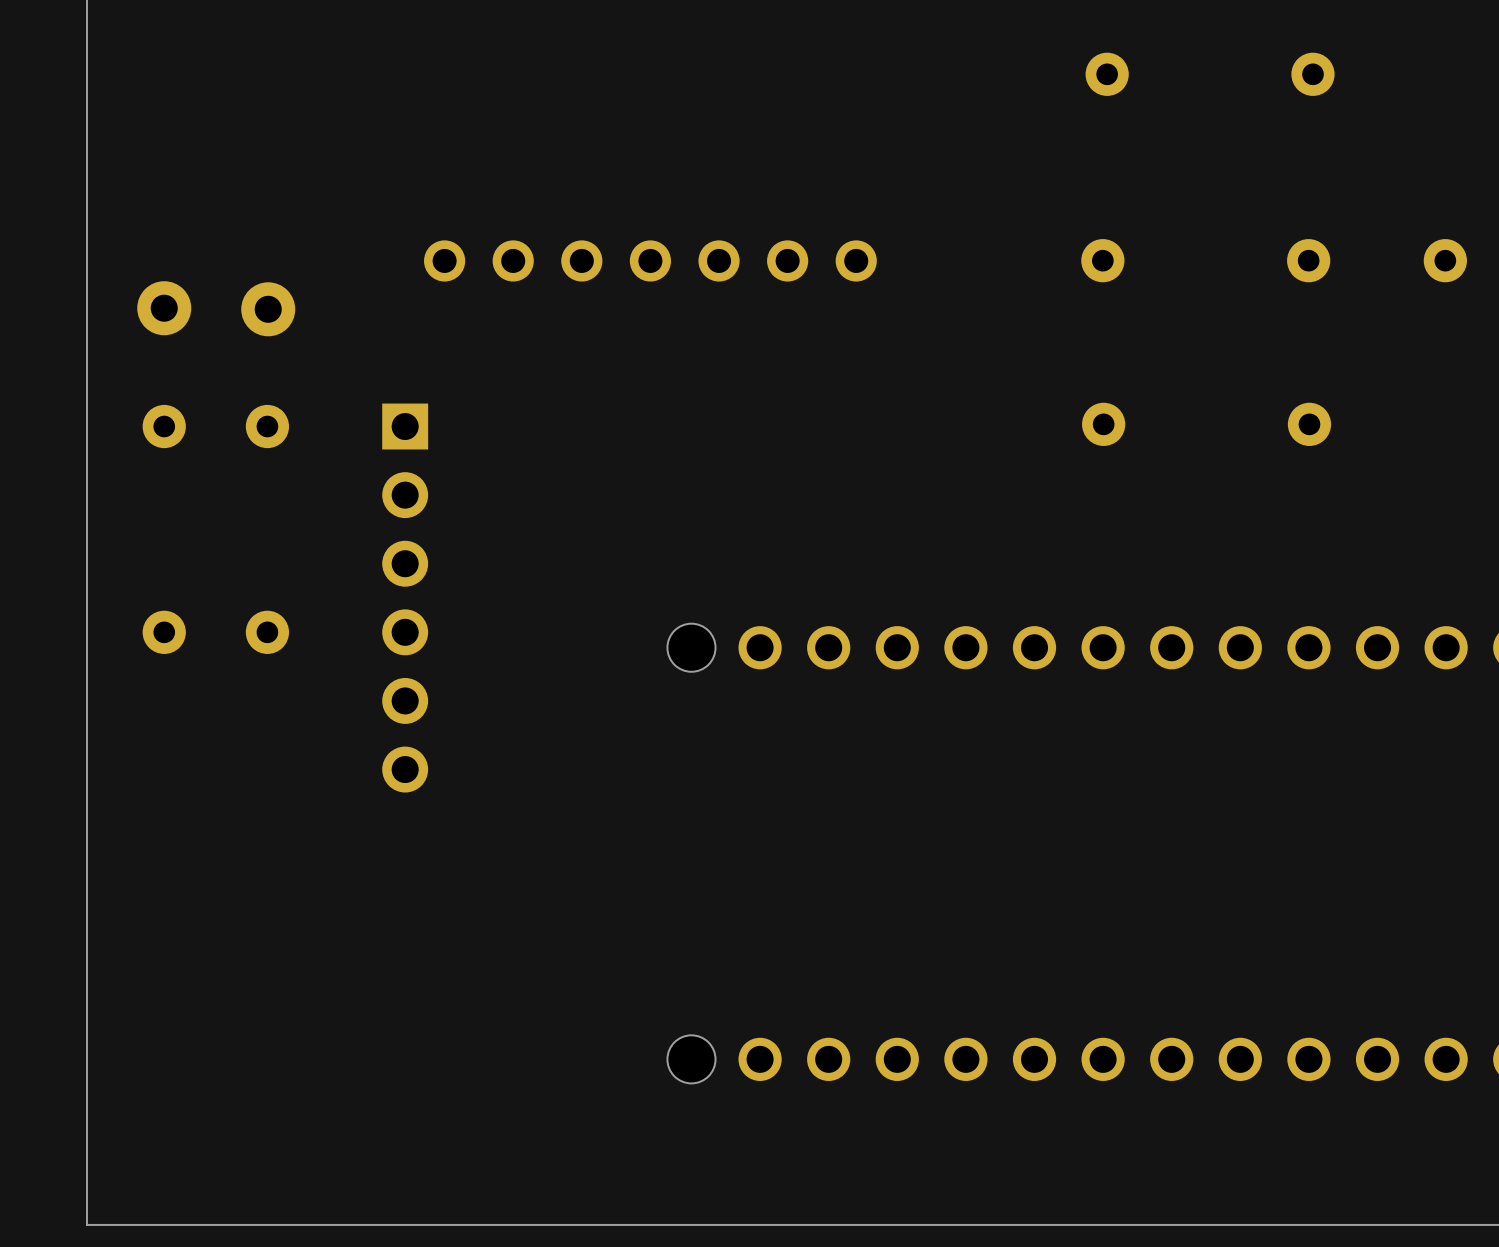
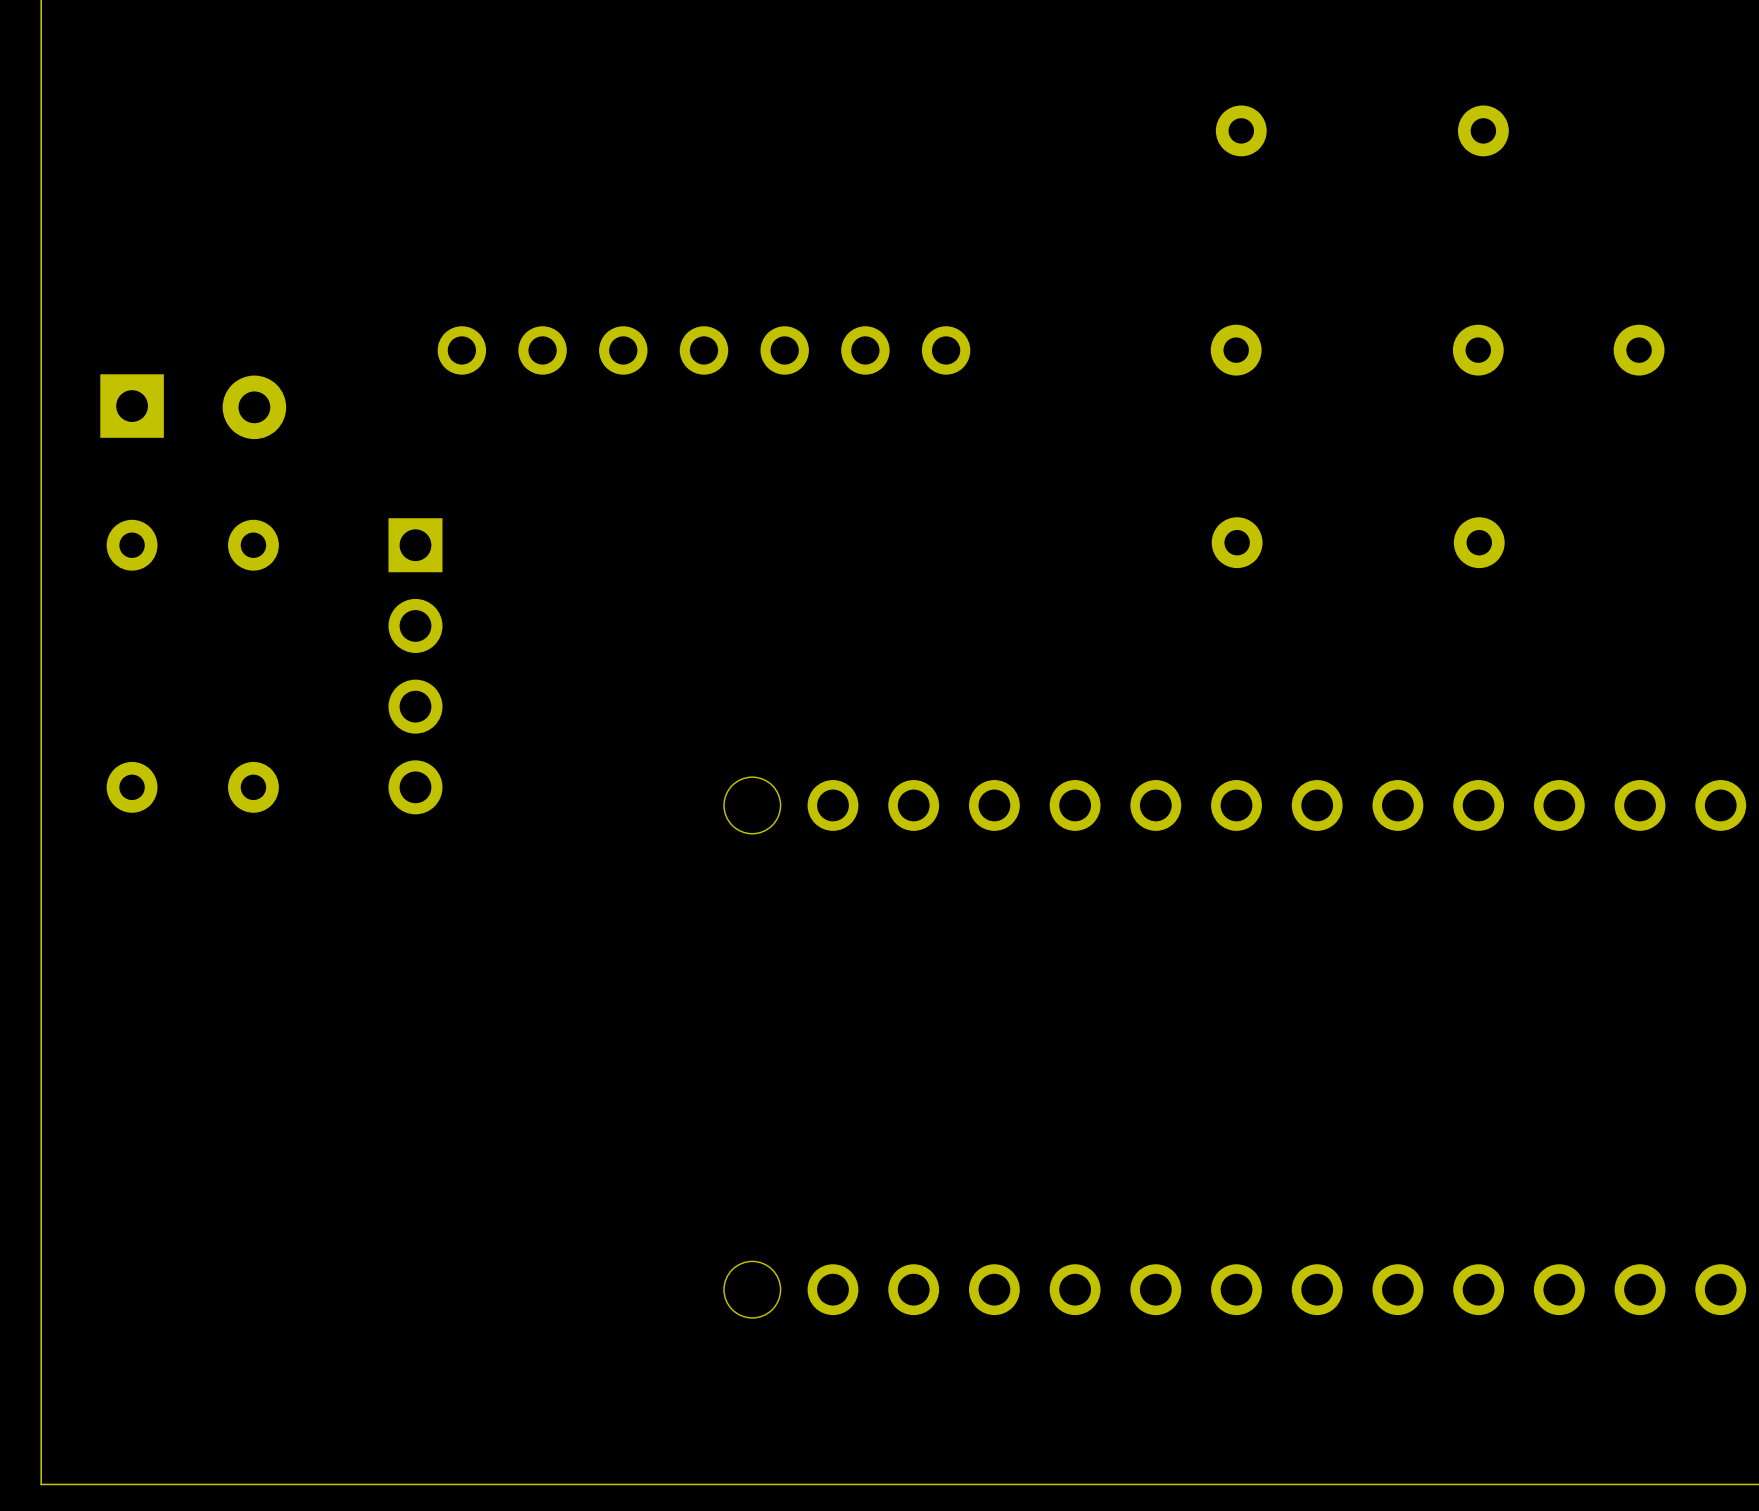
part footprint: [137, 281, 192, 336] -> [100, 374, 164, 438]
part: (405, 598) -> none

